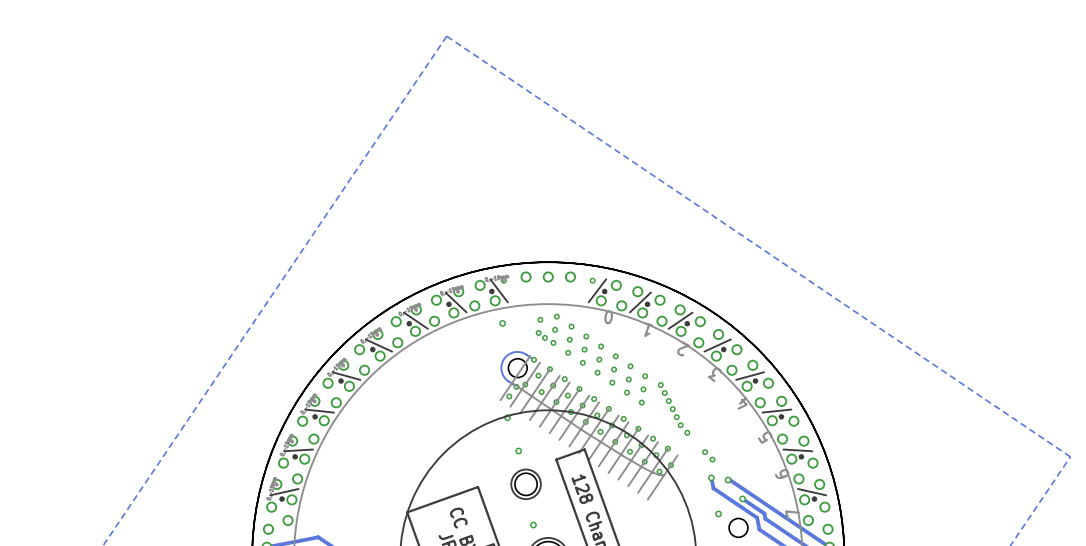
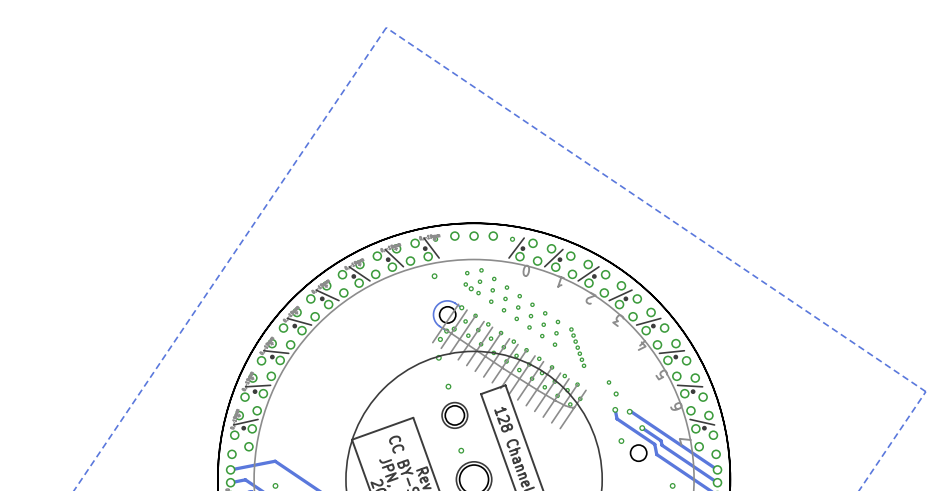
part footprint: [499, 313, 691, 501] -> [431, 268, 587, 430]
via: none -> (609, 382)
via: (705, 452) -> none

